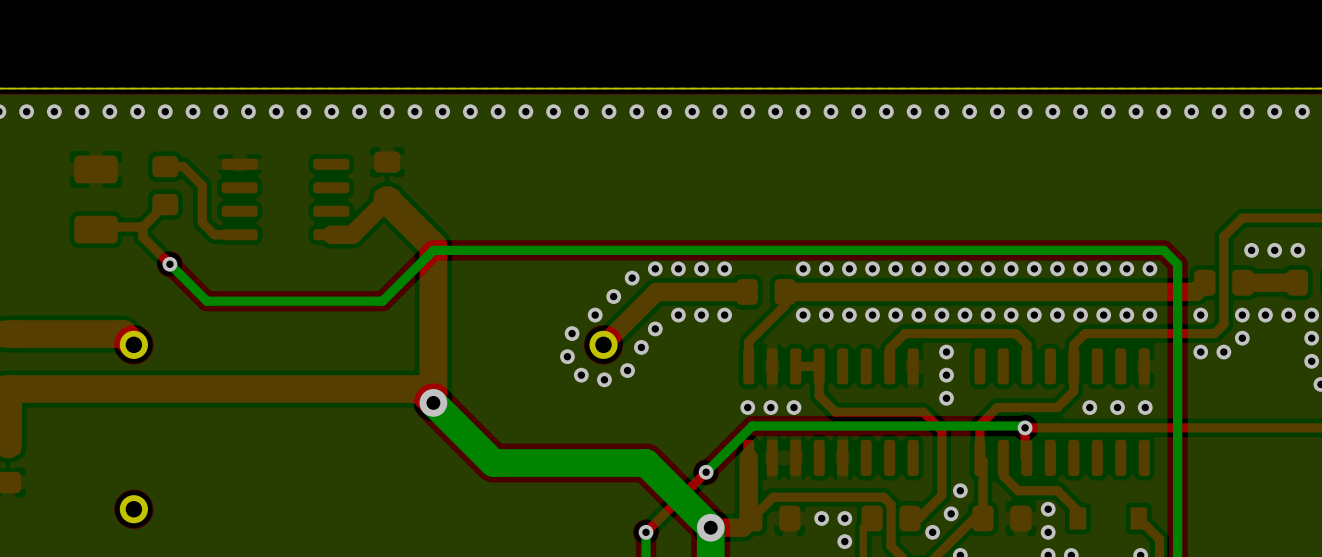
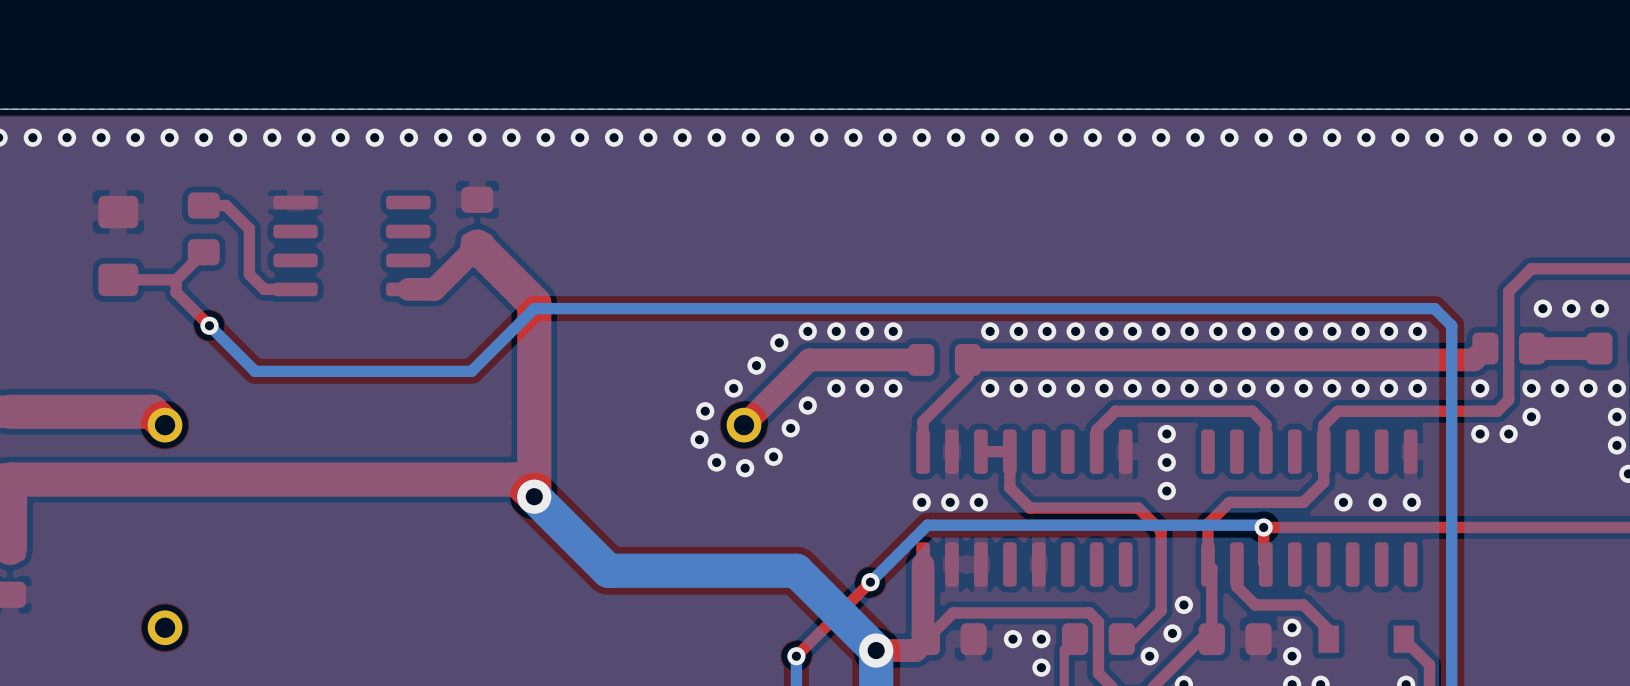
part footprint: [74, 155, 118, 244] -> [98, 195, 139, 297]

